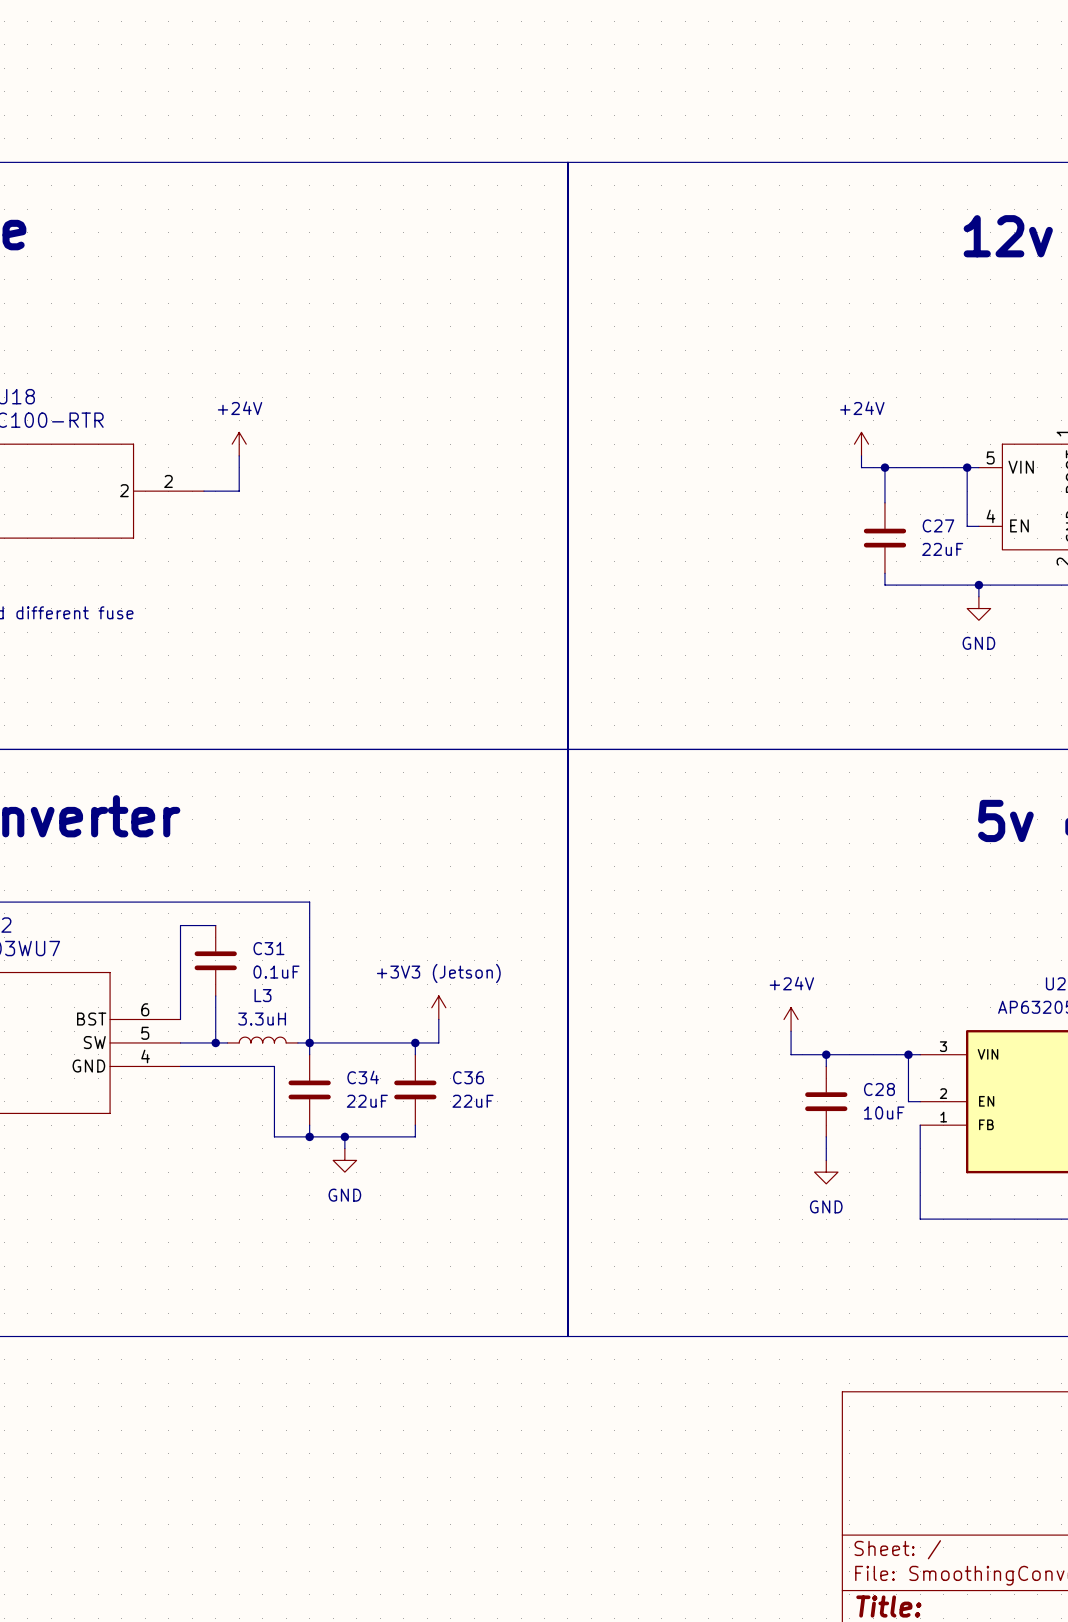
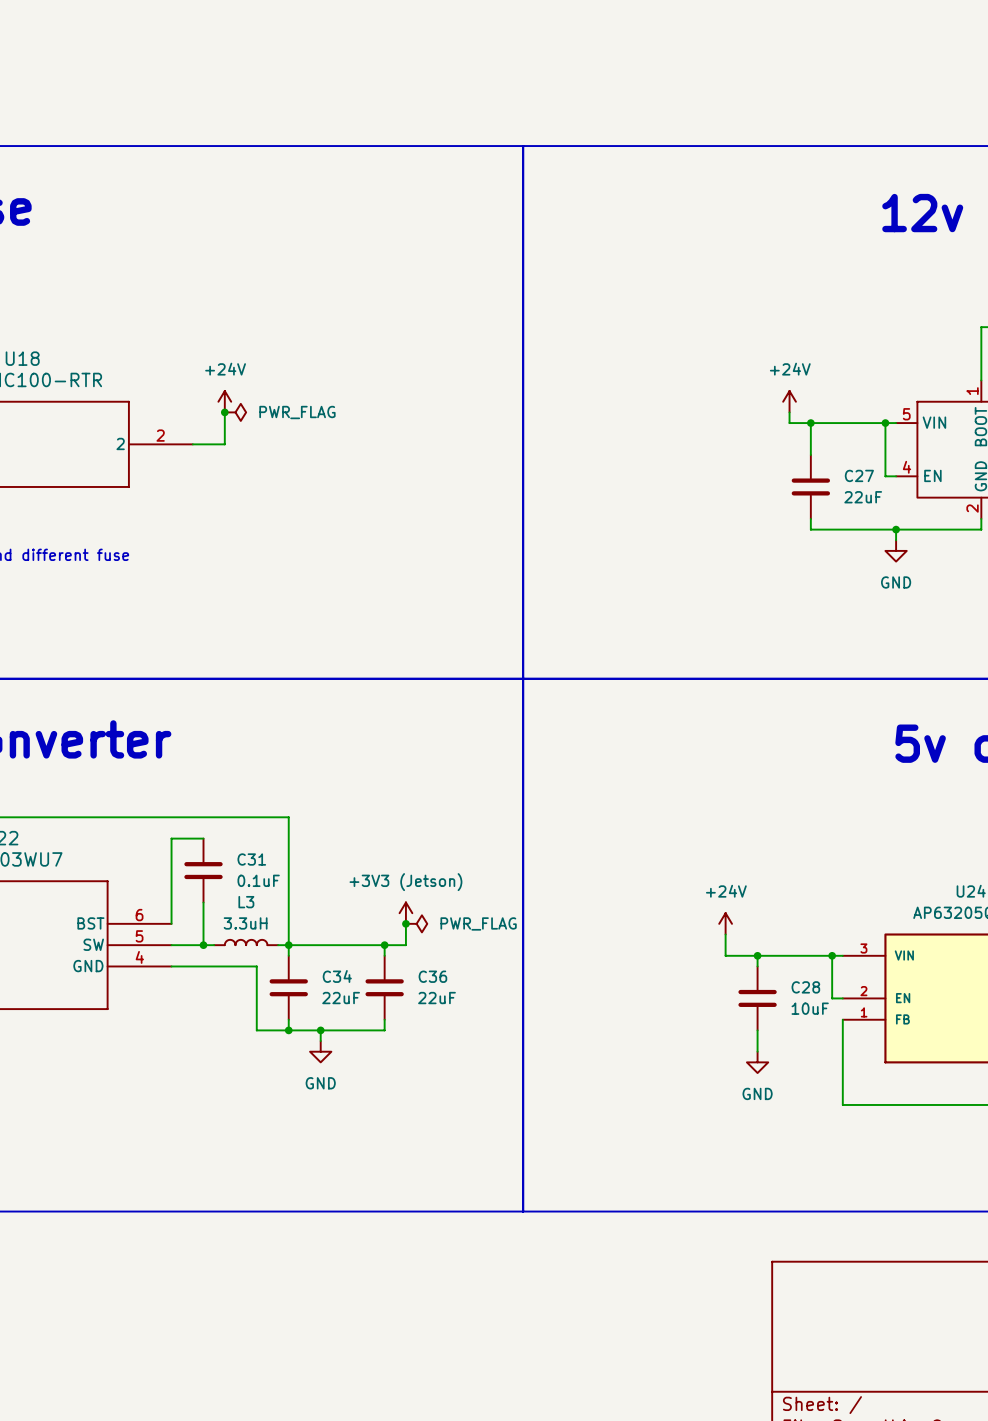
junction: none -> (224, 412)
power symbol: none -> PWR_FLAG (235, 412)
junction: none -> (405, 923)
power symbol: none -> PWR_FLAG (416, 923)

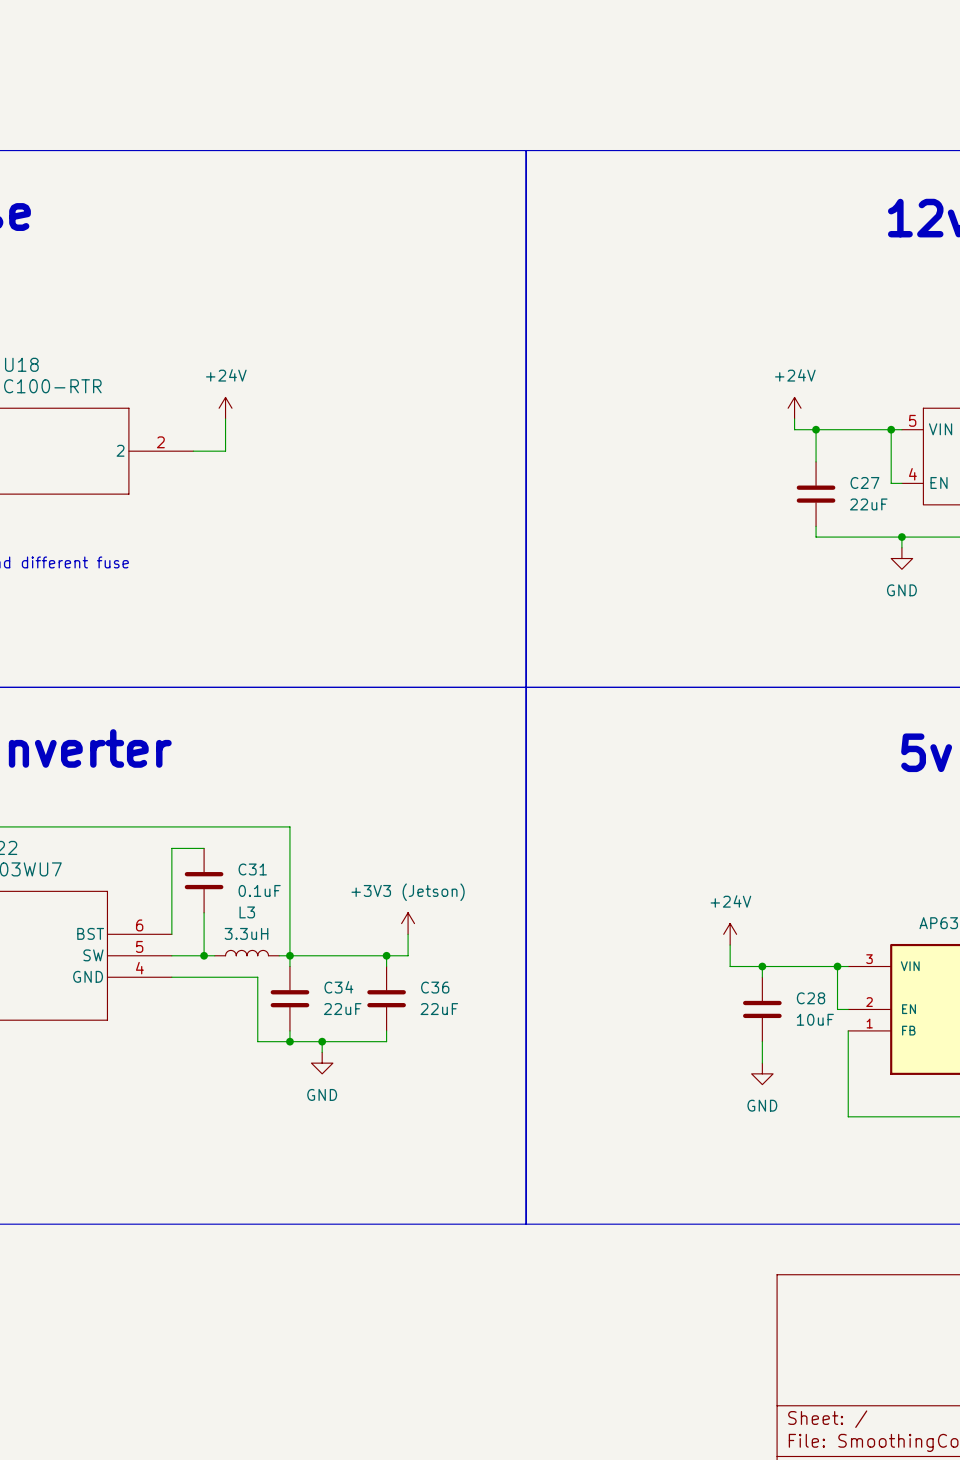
junction: (224, 412) -> none
power symbol: PWR_FLAG (235, 412) -> none
junction: (405, 923) -> none
power symbol: PWR_FLAG (416, 923) -> none

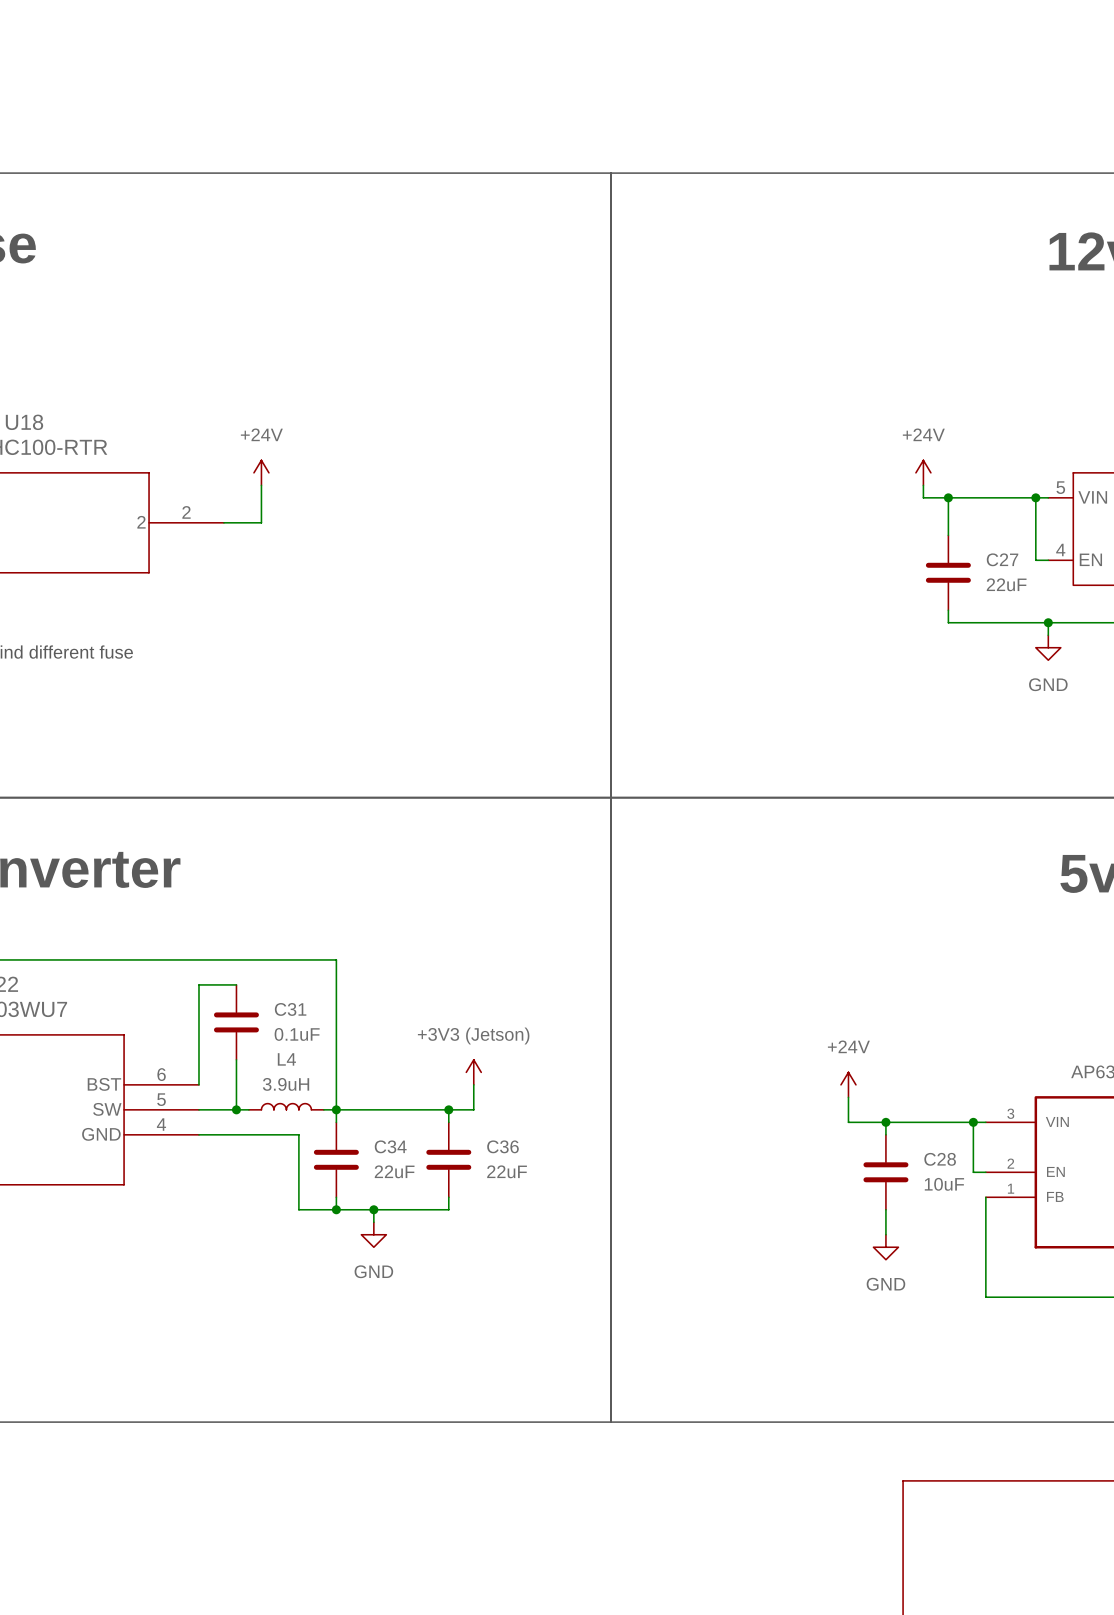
L3 name: L3 (247, 912) -> L4 (286, 1059)
L3 value: 3.3uH (246, 933) -> 3.9uH (286, 1084)

